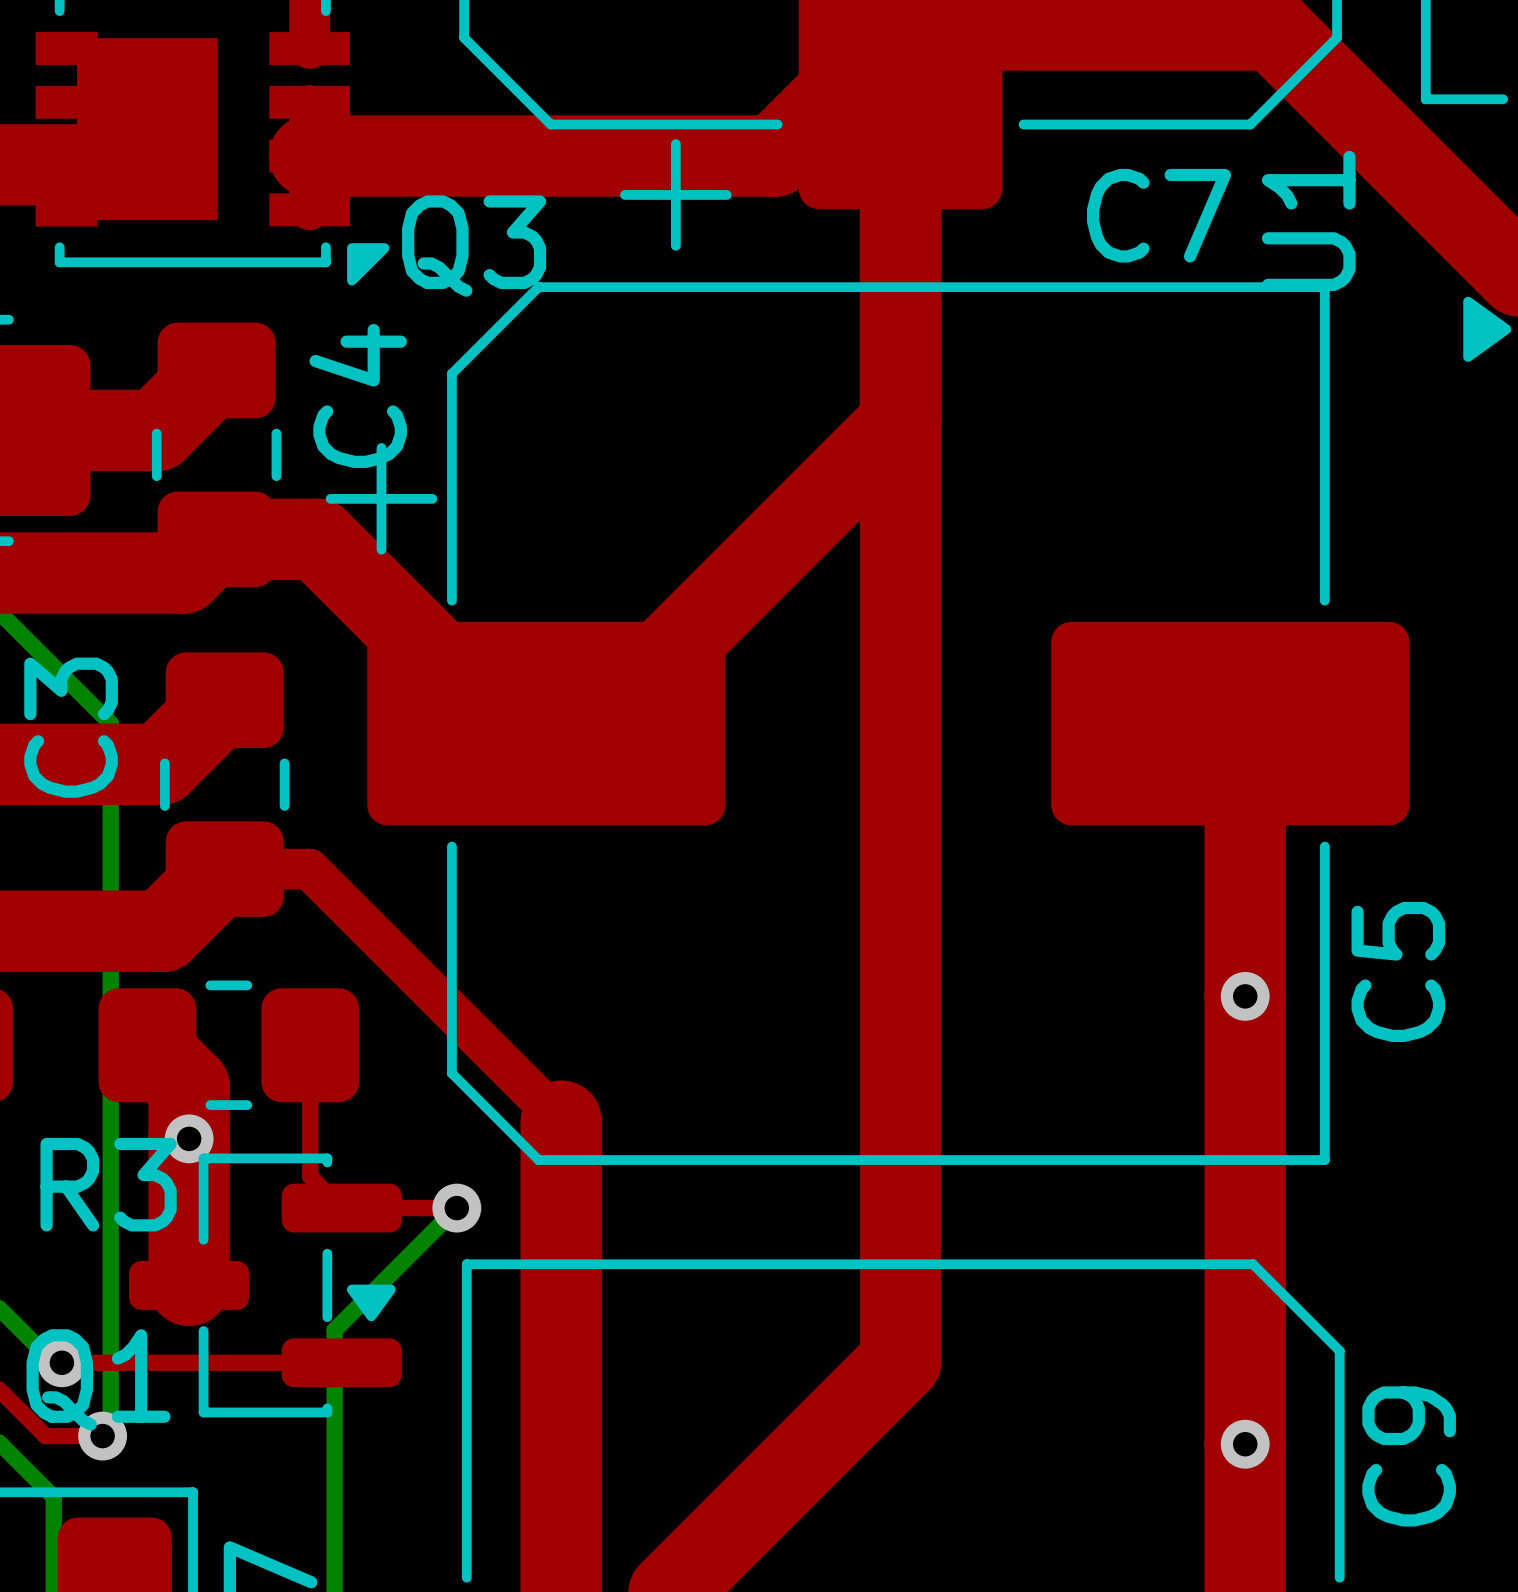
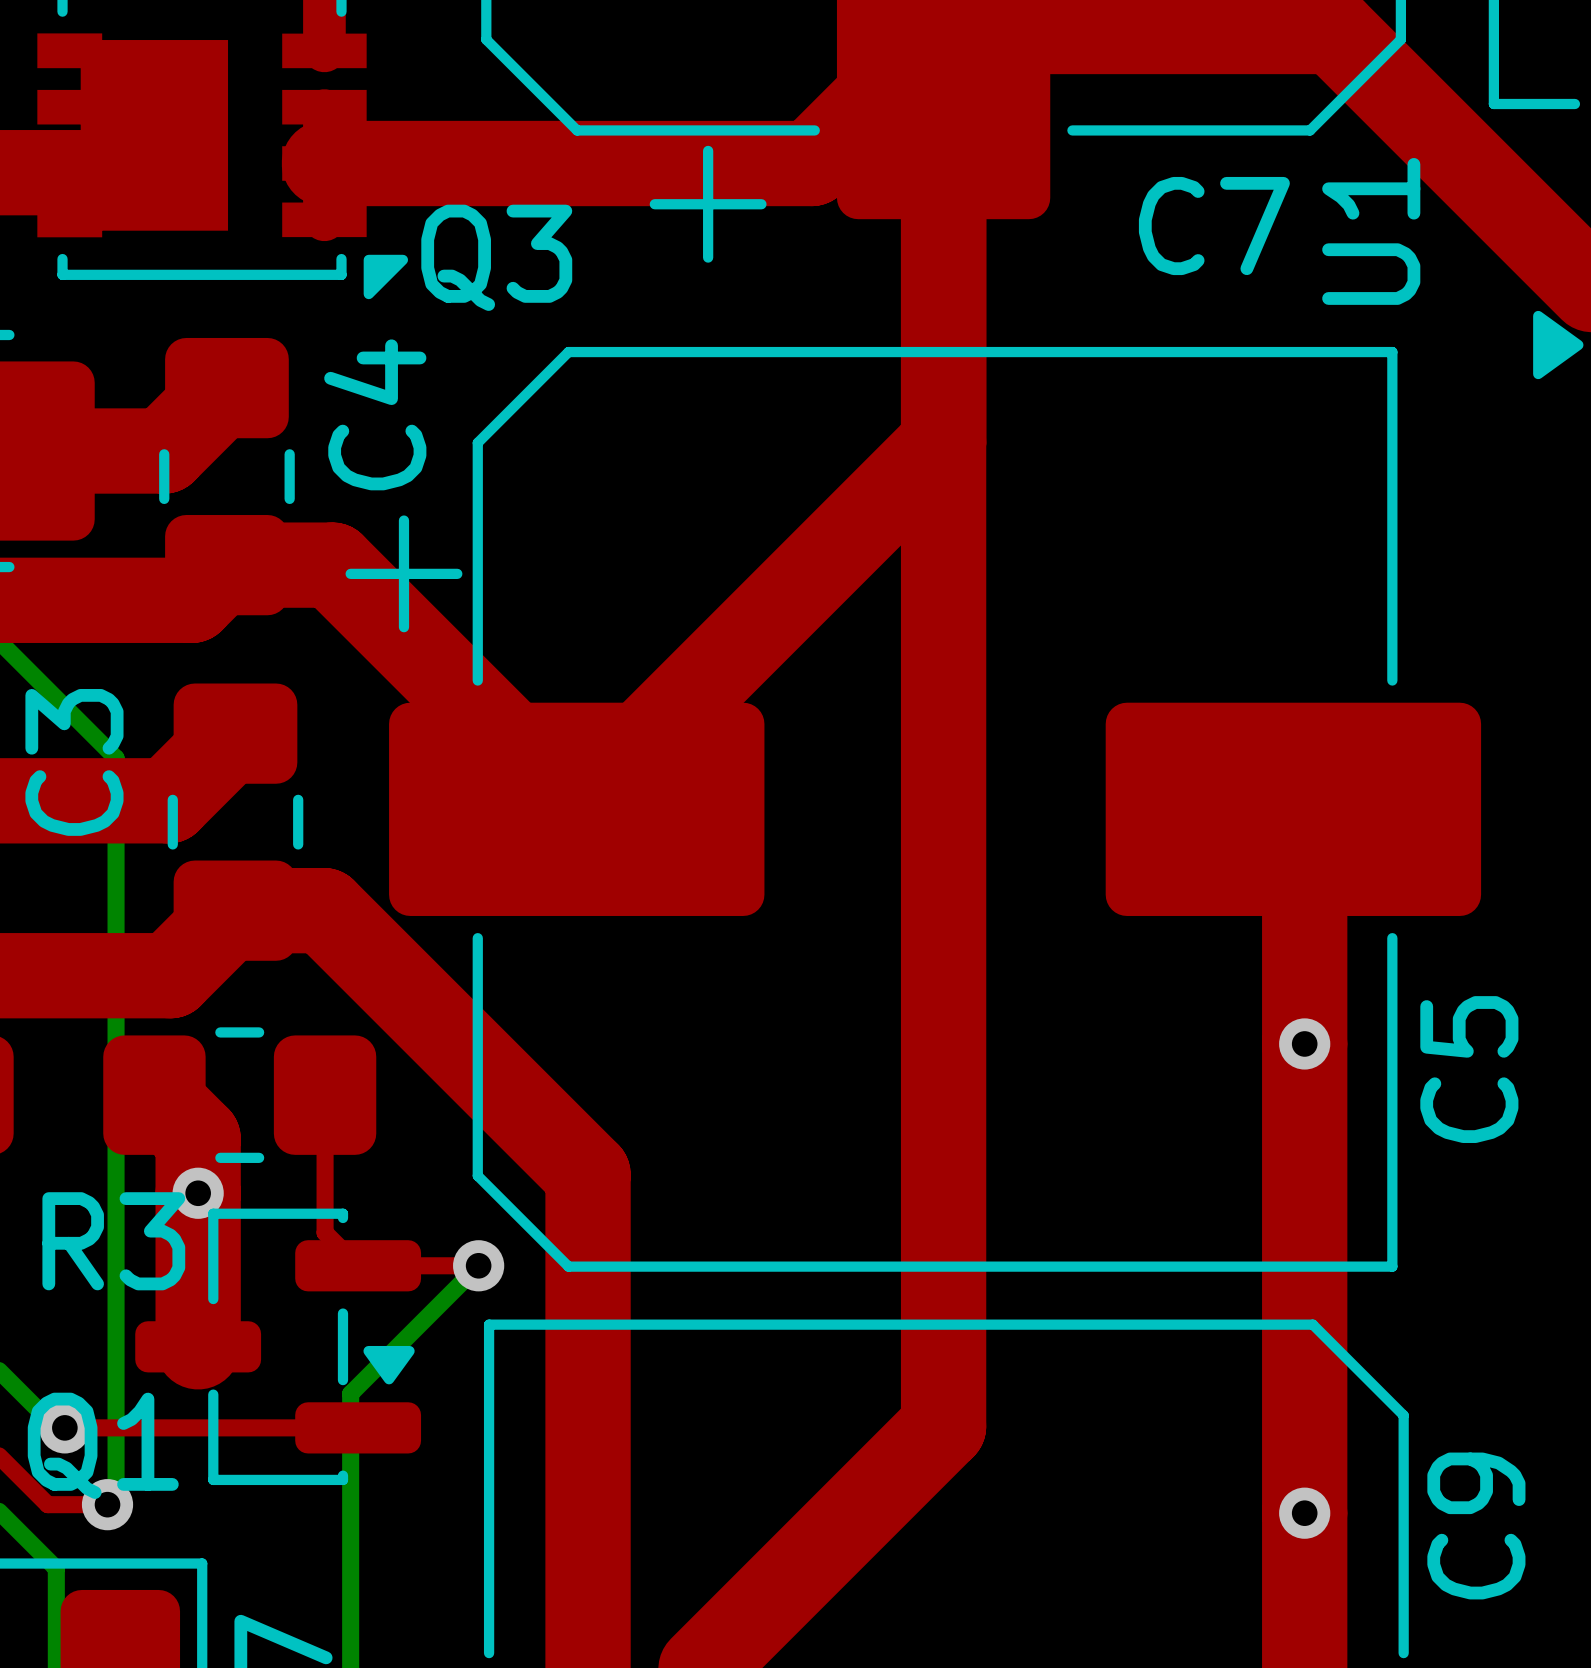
C5 position: (867, 723) -> (913, 809)
top track width: thin (224, 869) (309, 869) (561, 1121) -> thick (235, 910) (324, 910) (588, 1174)

